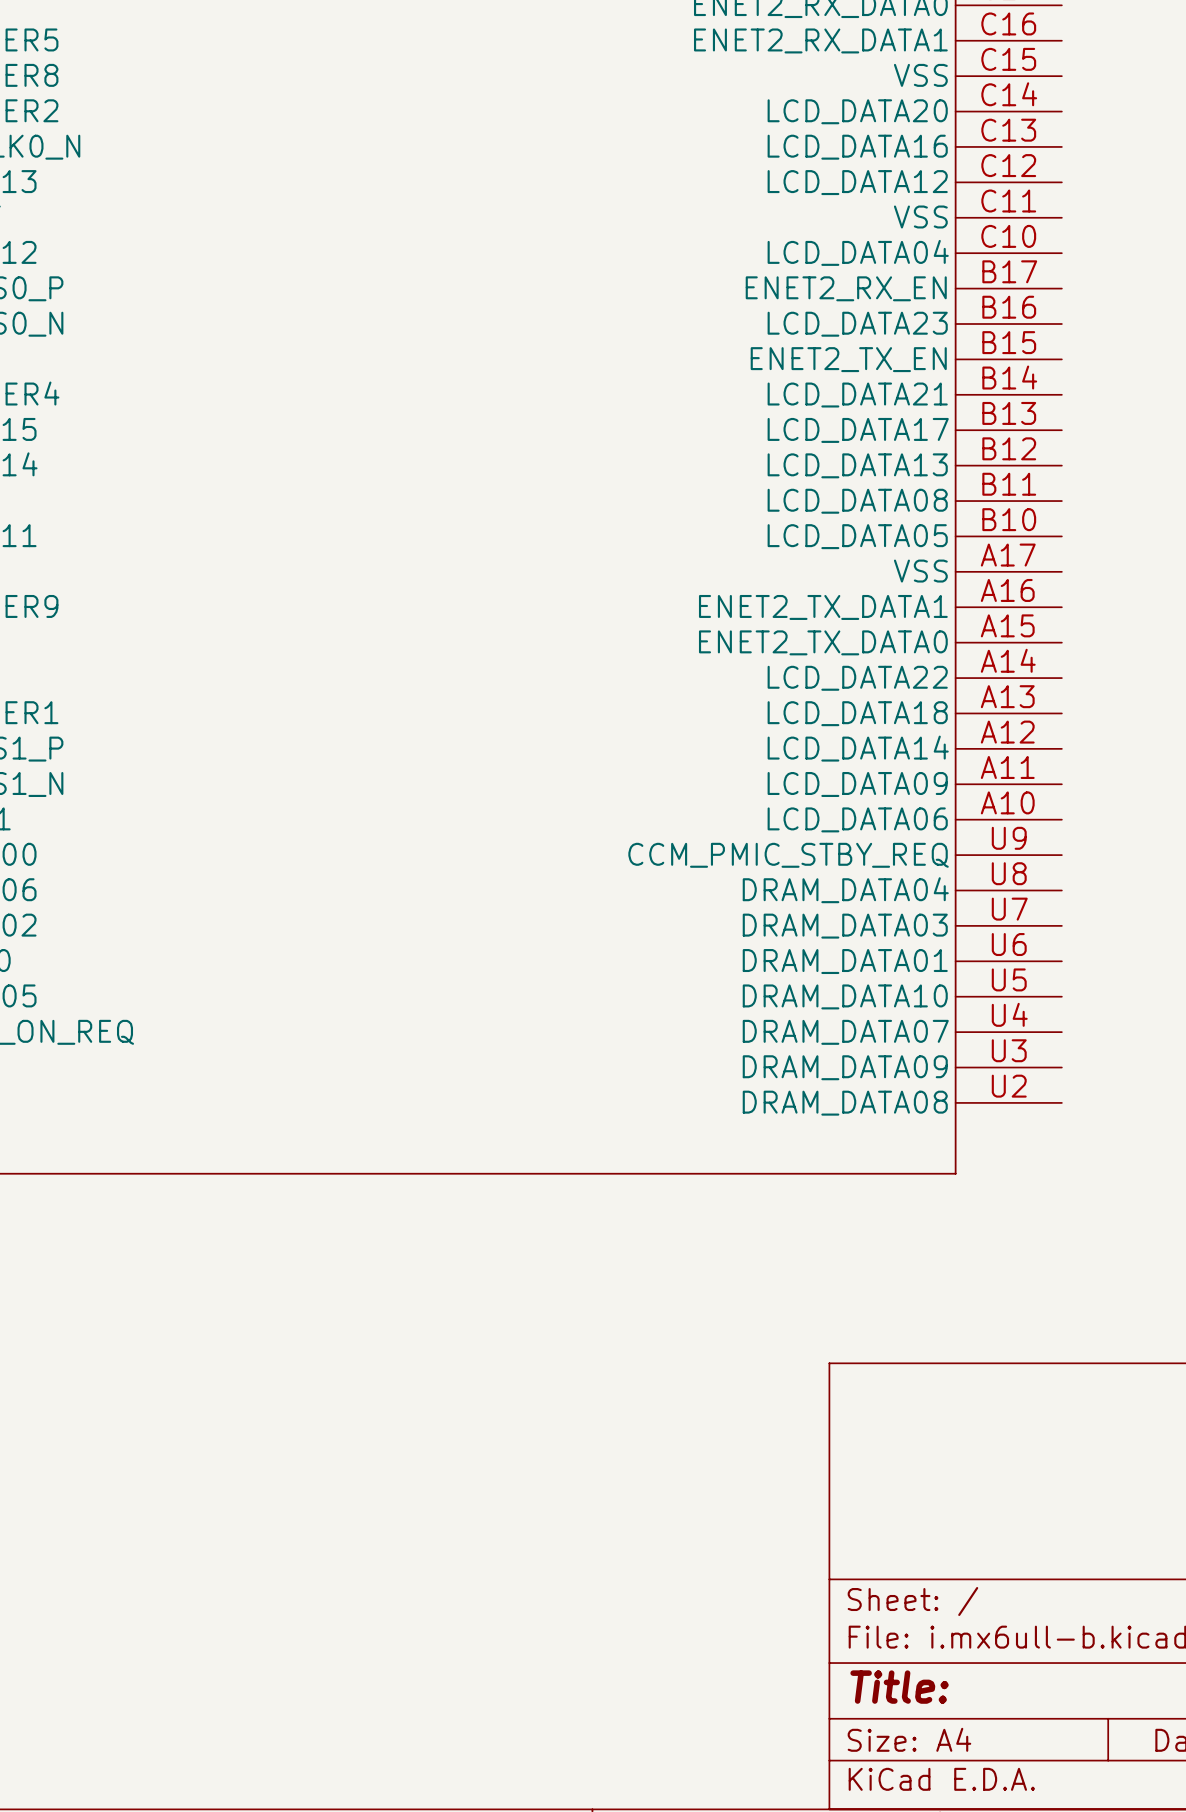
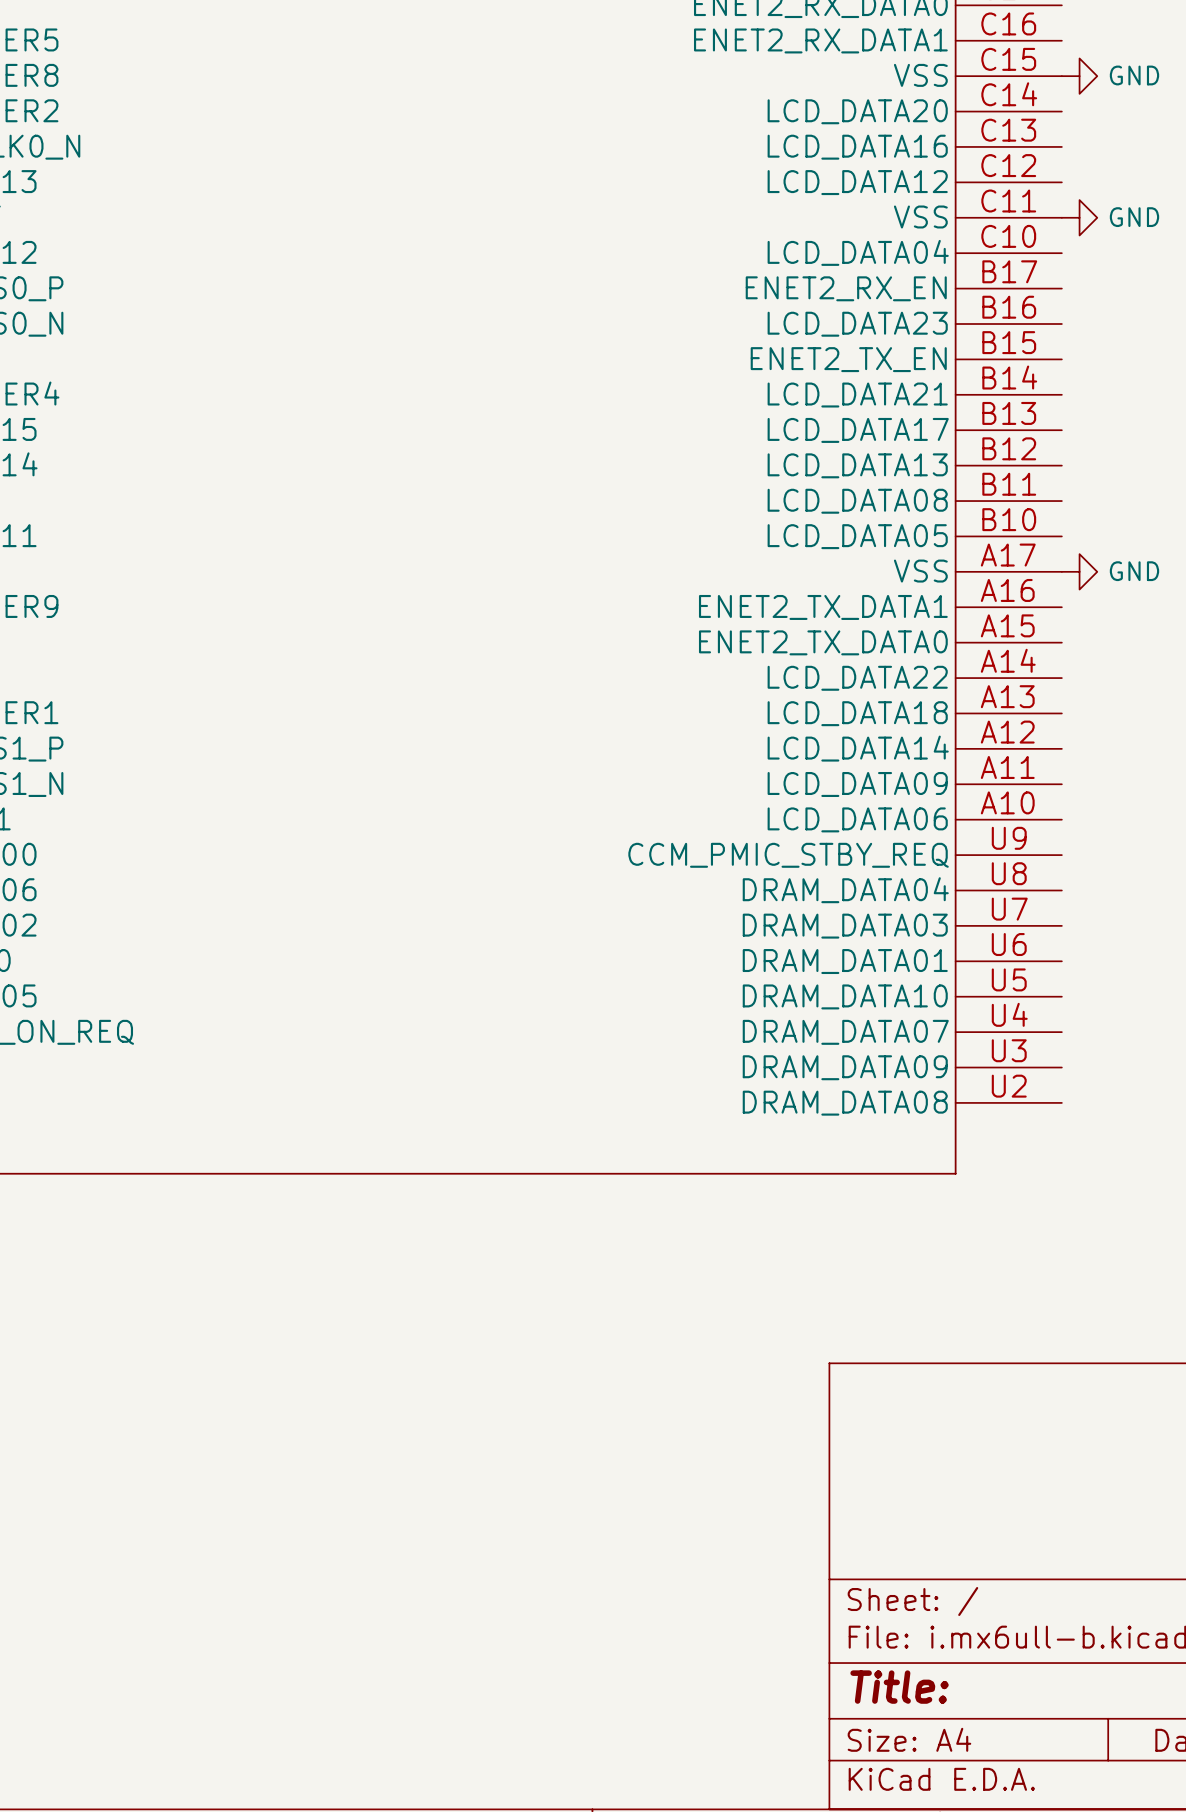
power symbol: none -> GND (1079, 76)
power symbol: none -> GND (1079, 217)
power symbol: none -> GND (1079, 571)

